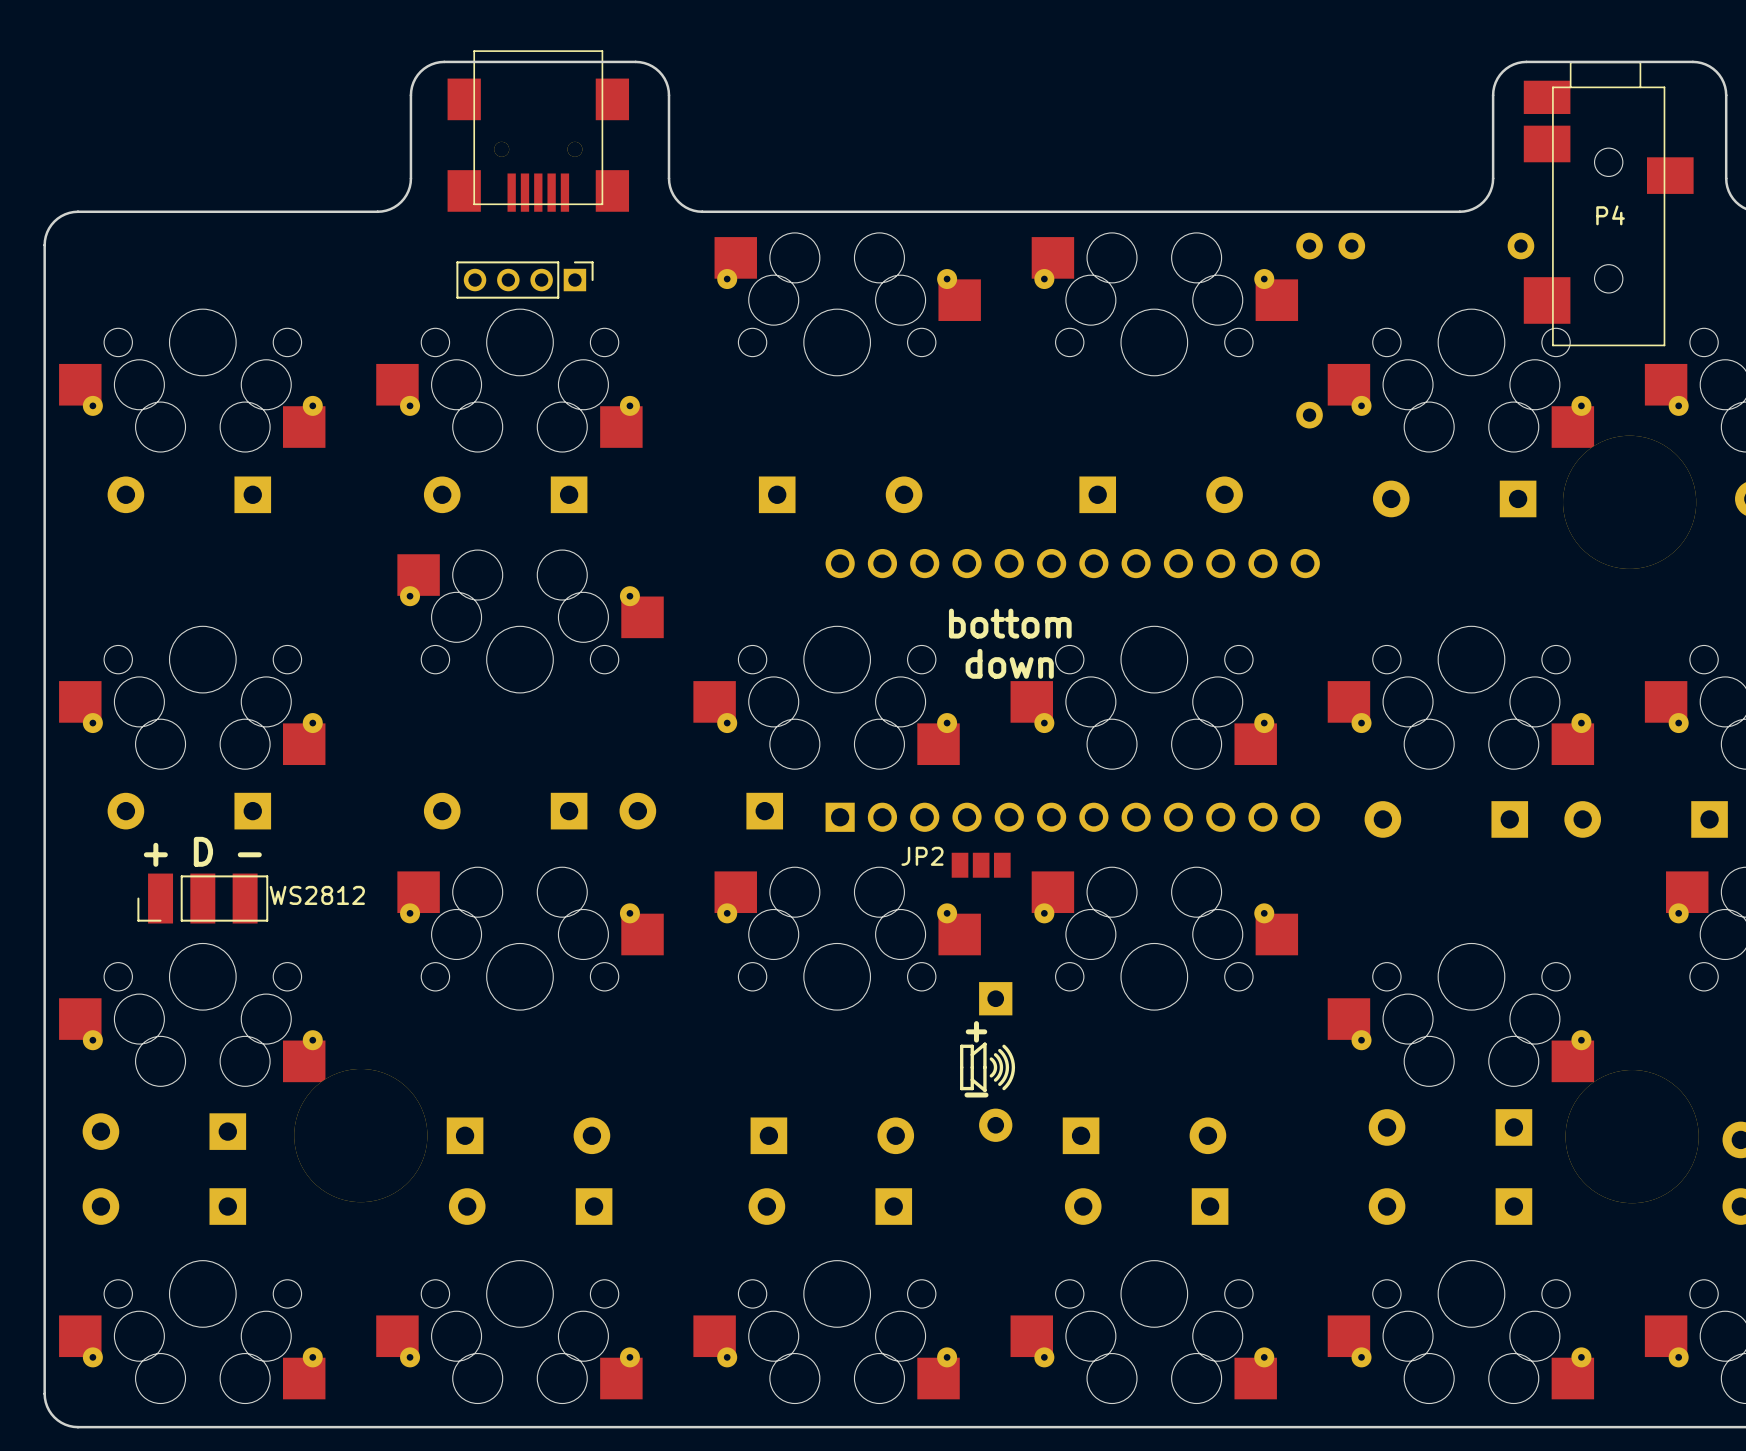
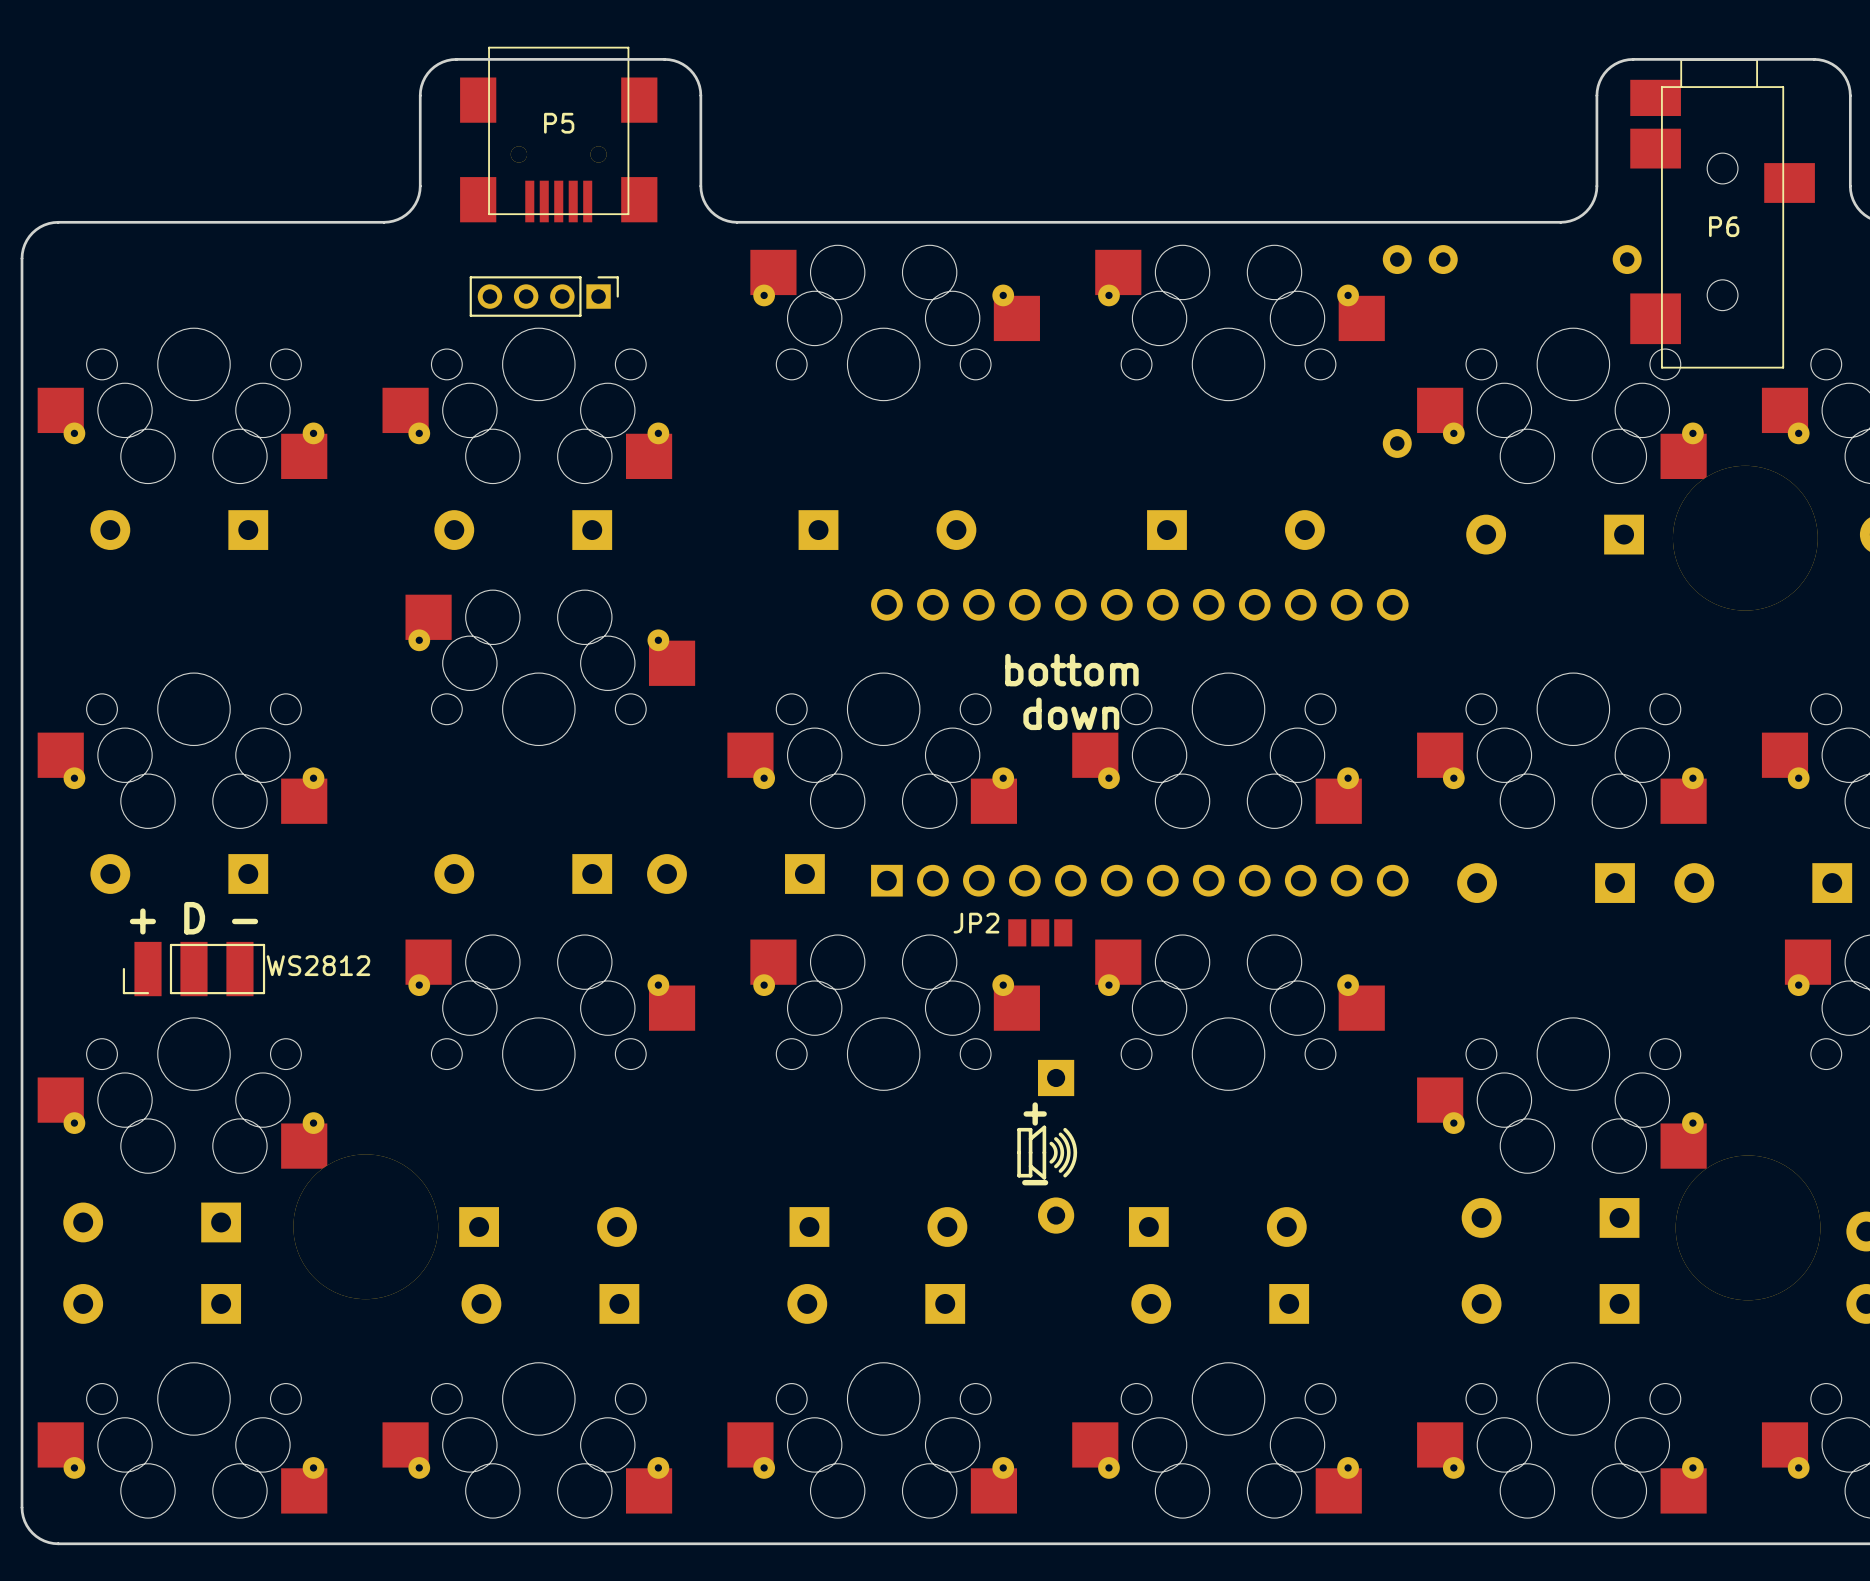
P5 name: none -> P5 (559, 123)
P4 name: P4 (1610, 215) -> P6 (1724, 226)

